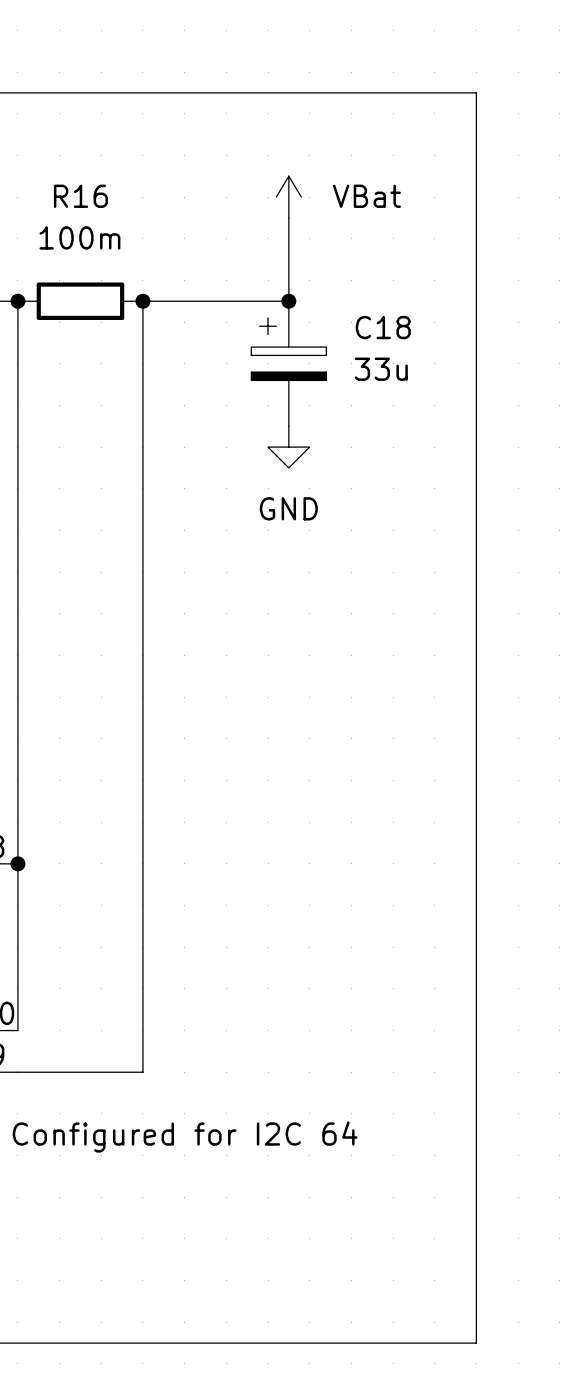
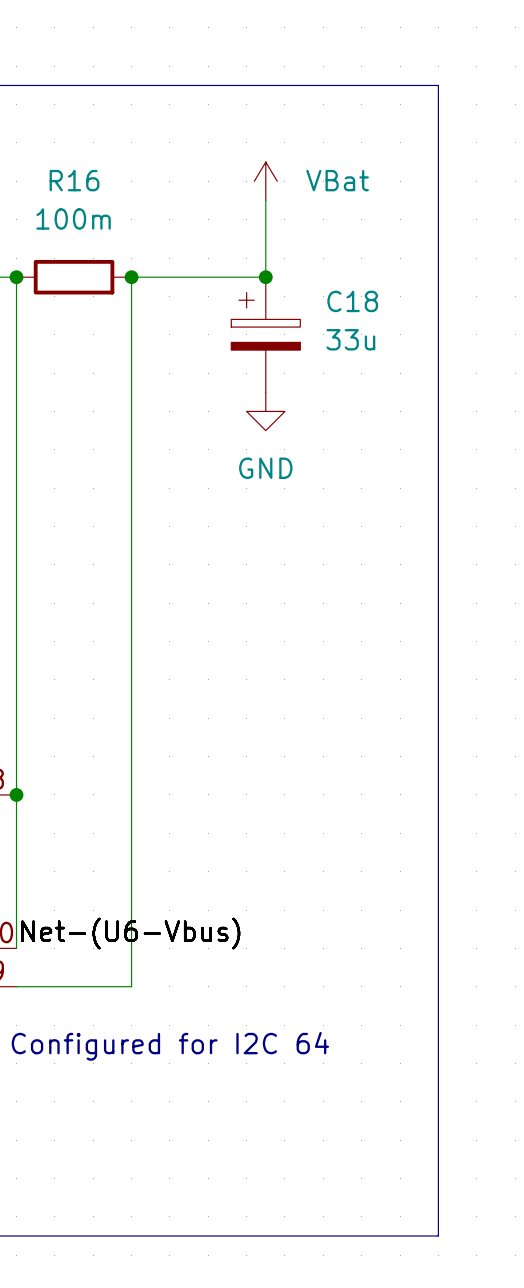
label: none -> Net-(U6-Vbus) (130, 933)

